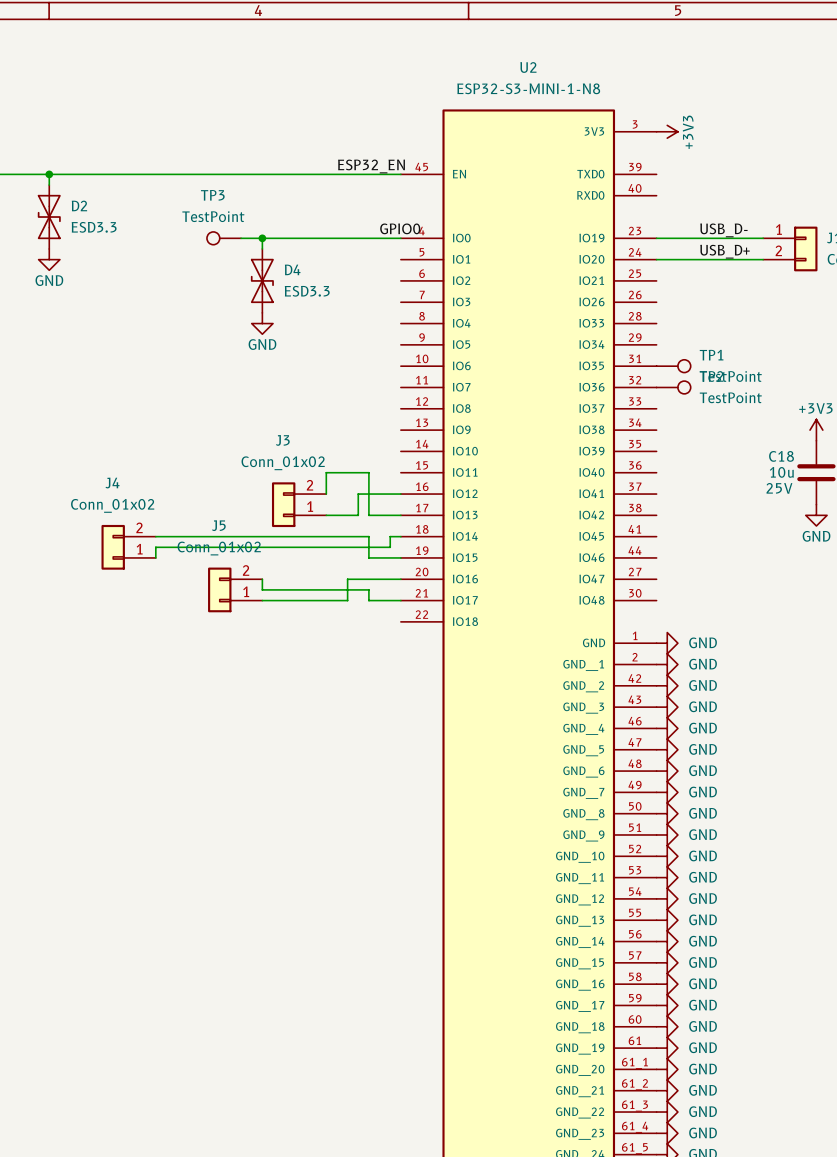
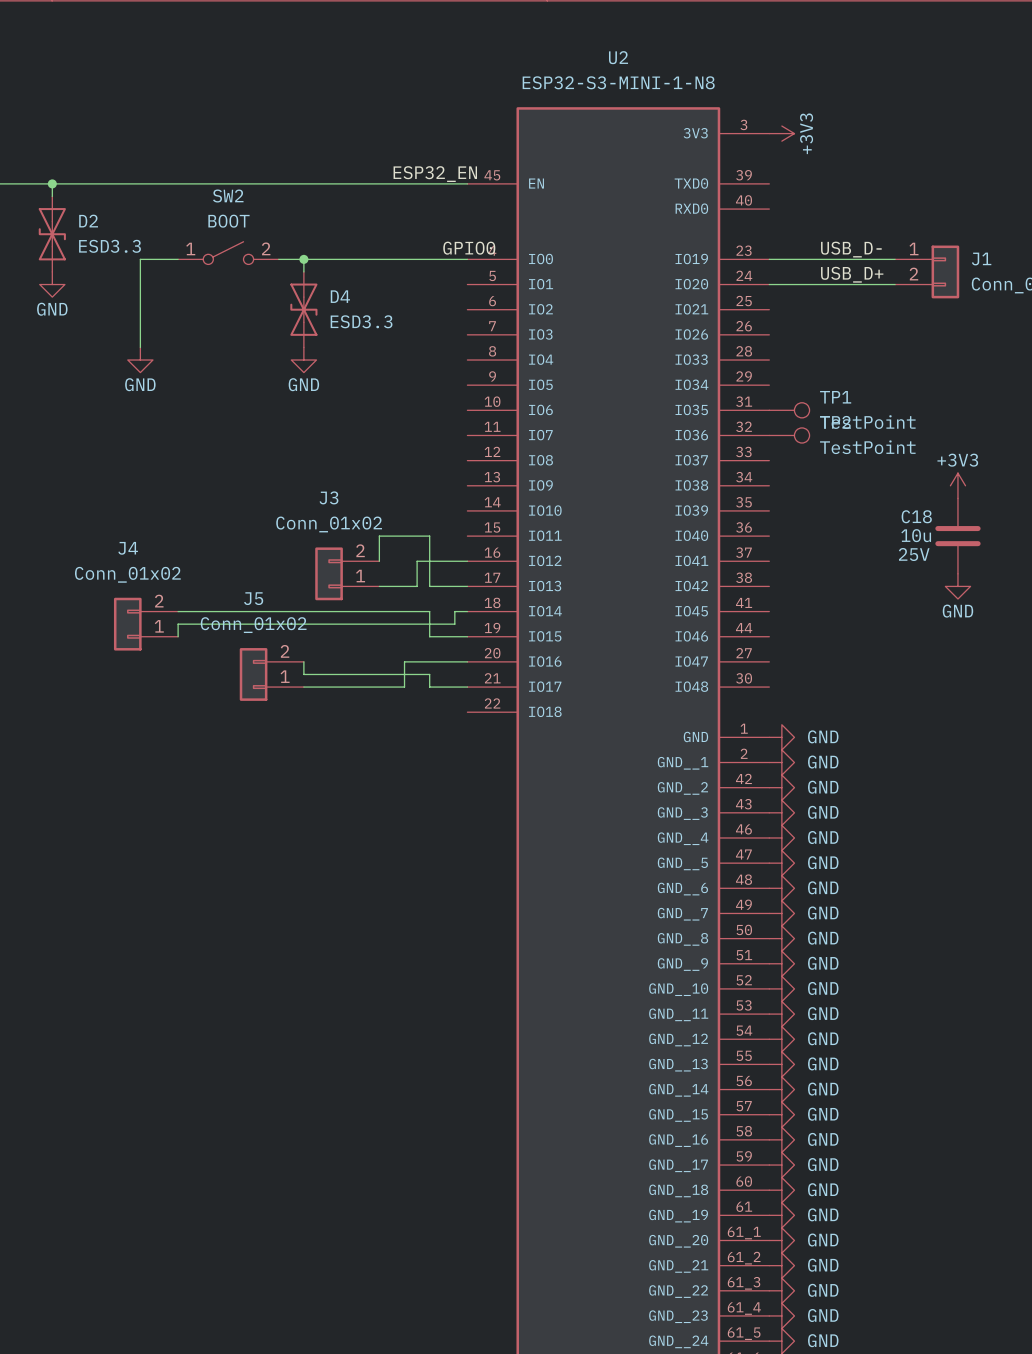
SW2: none -> BOOT (228, 253)
wire: none -> (178, 259) (140, 259) (140, 347)
TP3: TestPoint (224, 238) -> none
power symbol: none -> GND (140, 360)

